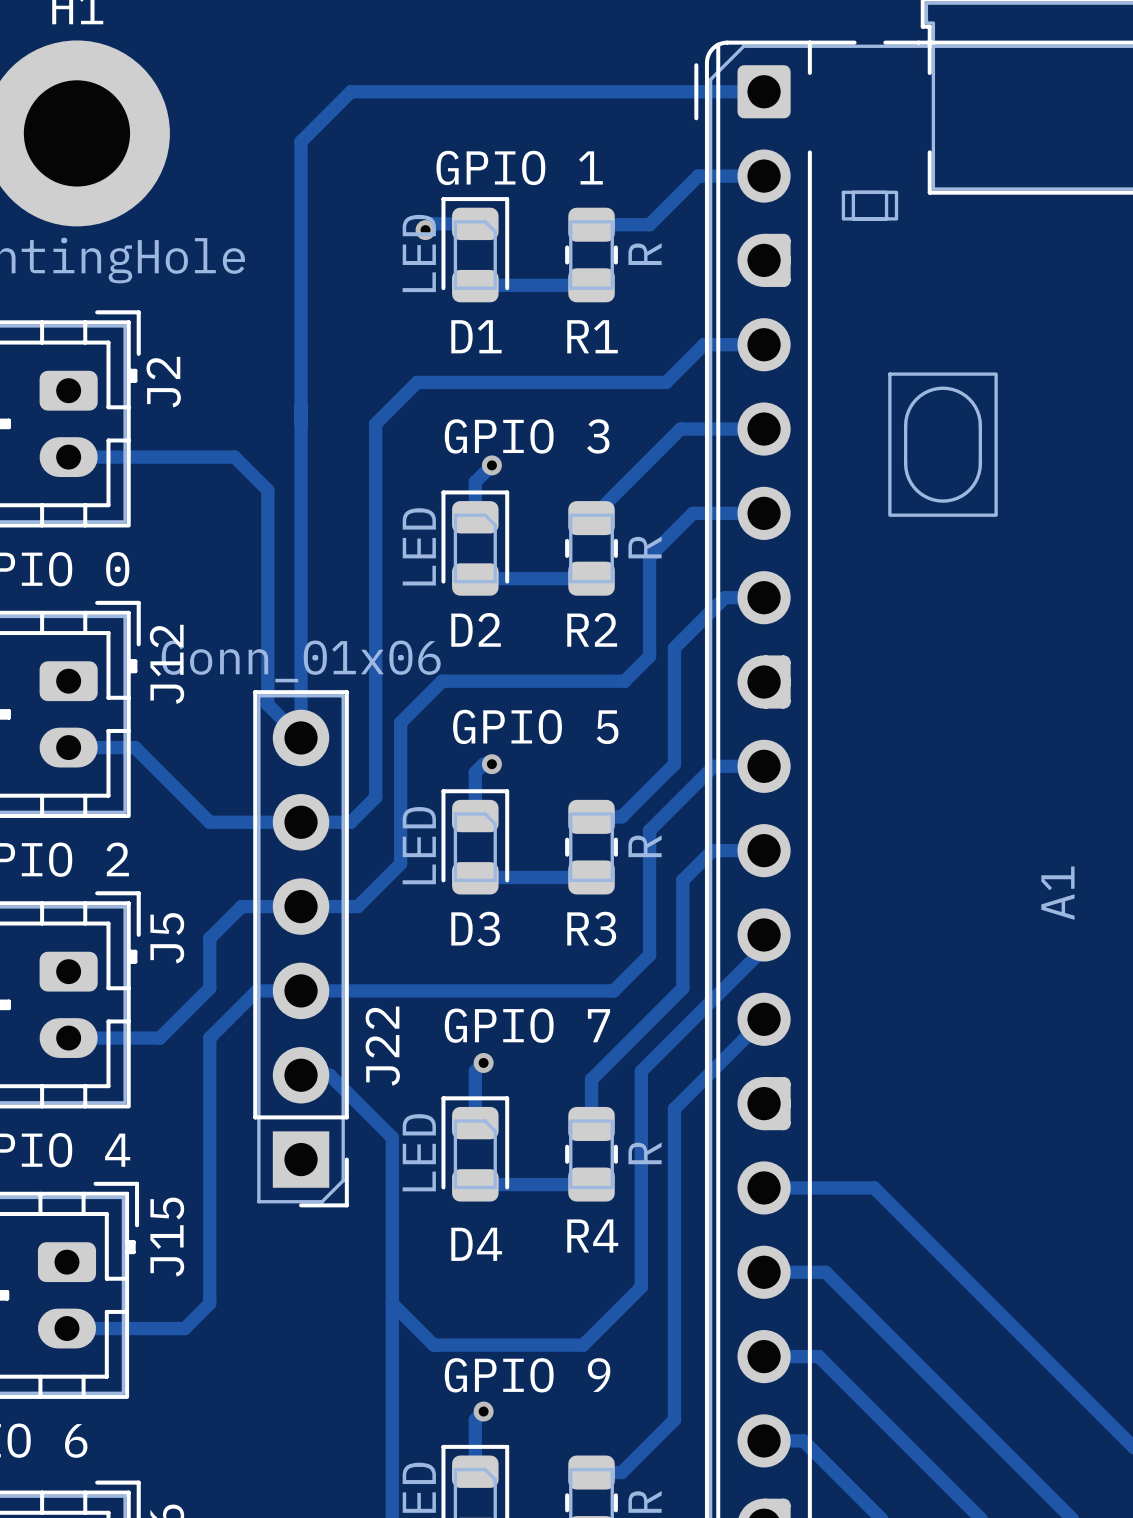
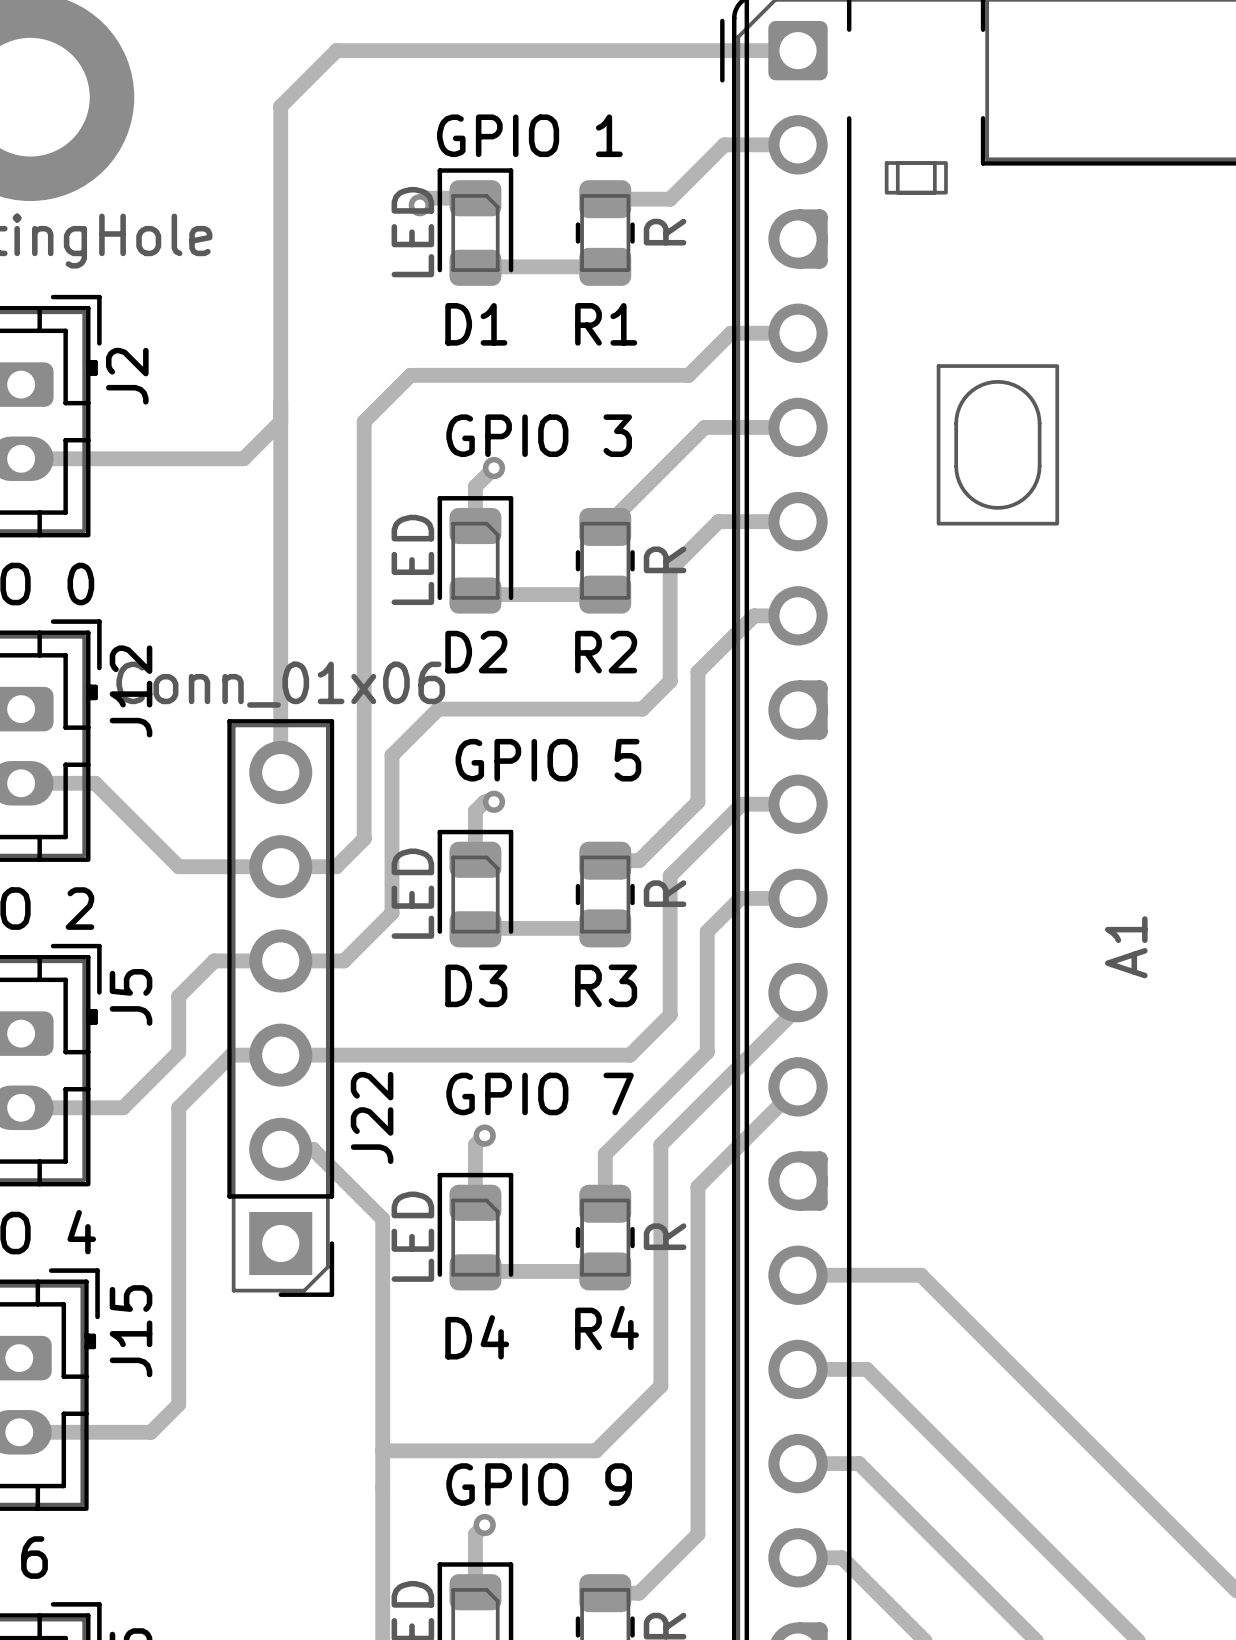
track: (234, 457) (267, 490) (267, 704) (301, 737) -> (206, 458) (243, 458) (280, 421)
track: (392, 1303) (433, 1345) -> (382, 1450) (429, 1450)

